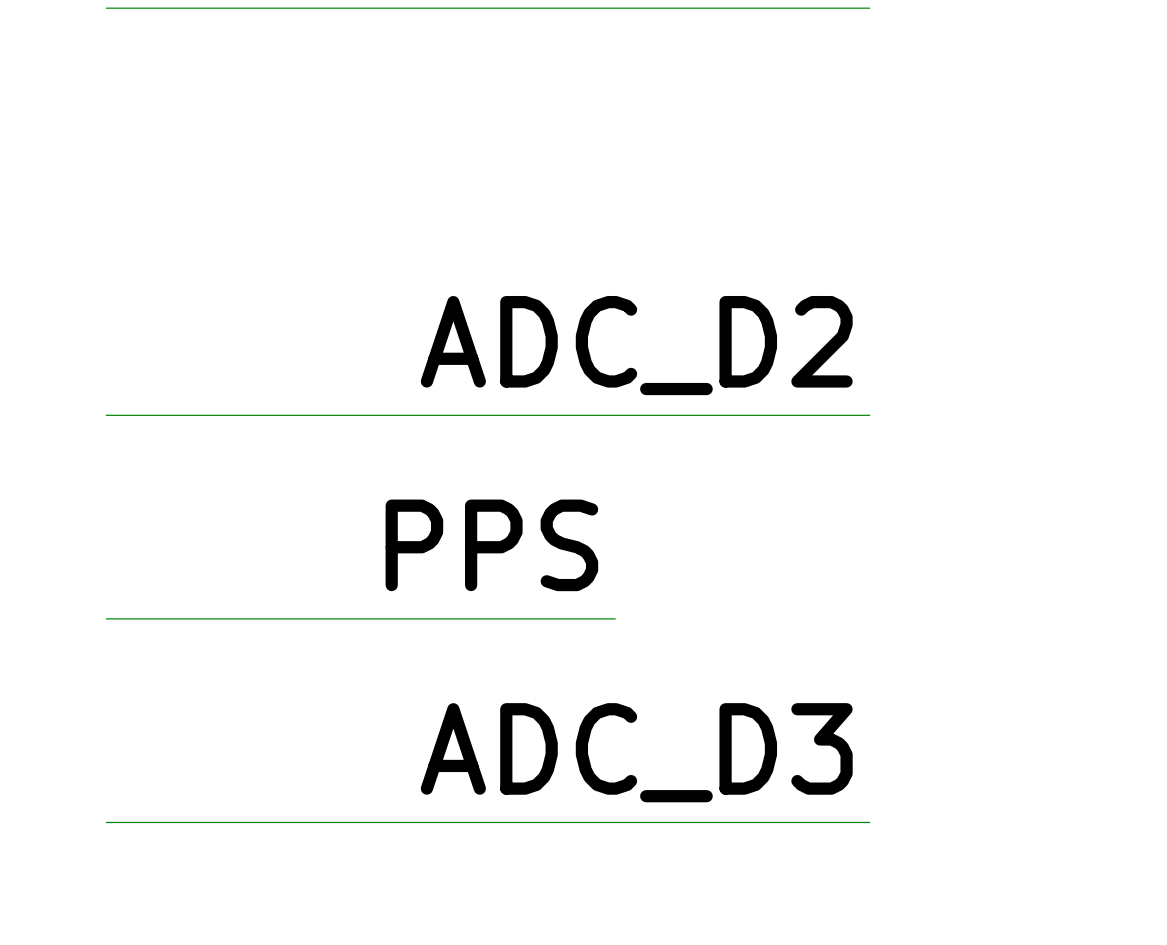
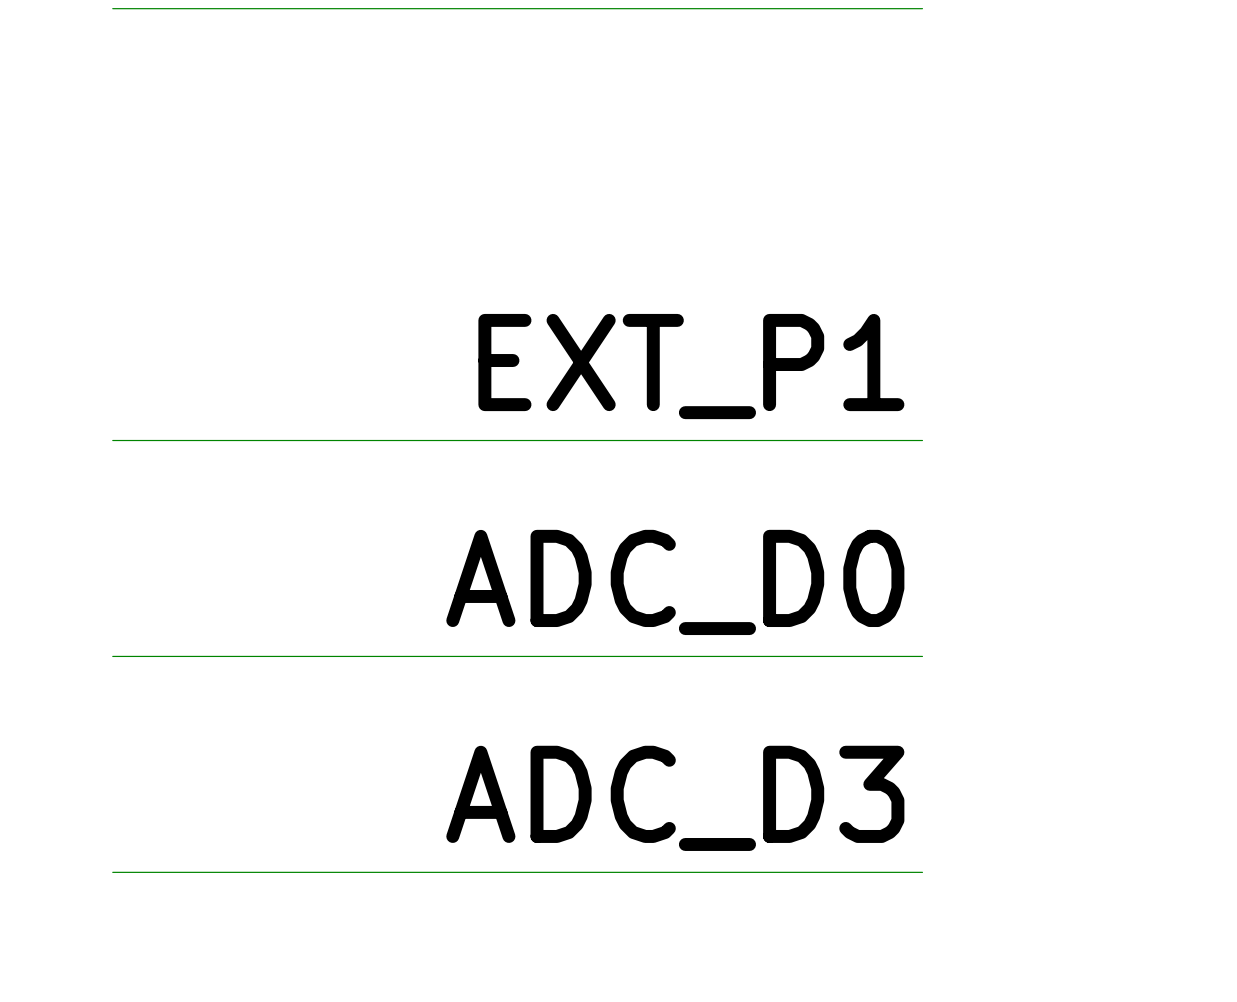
label: ADC_D2 (636, 345) -> EXT_P1 (691, 366)
label: PPS (491, 545) -> none
label: none -> ADC_D0 (675, 582)
wire: none -> (652, 656) (922, 656)

